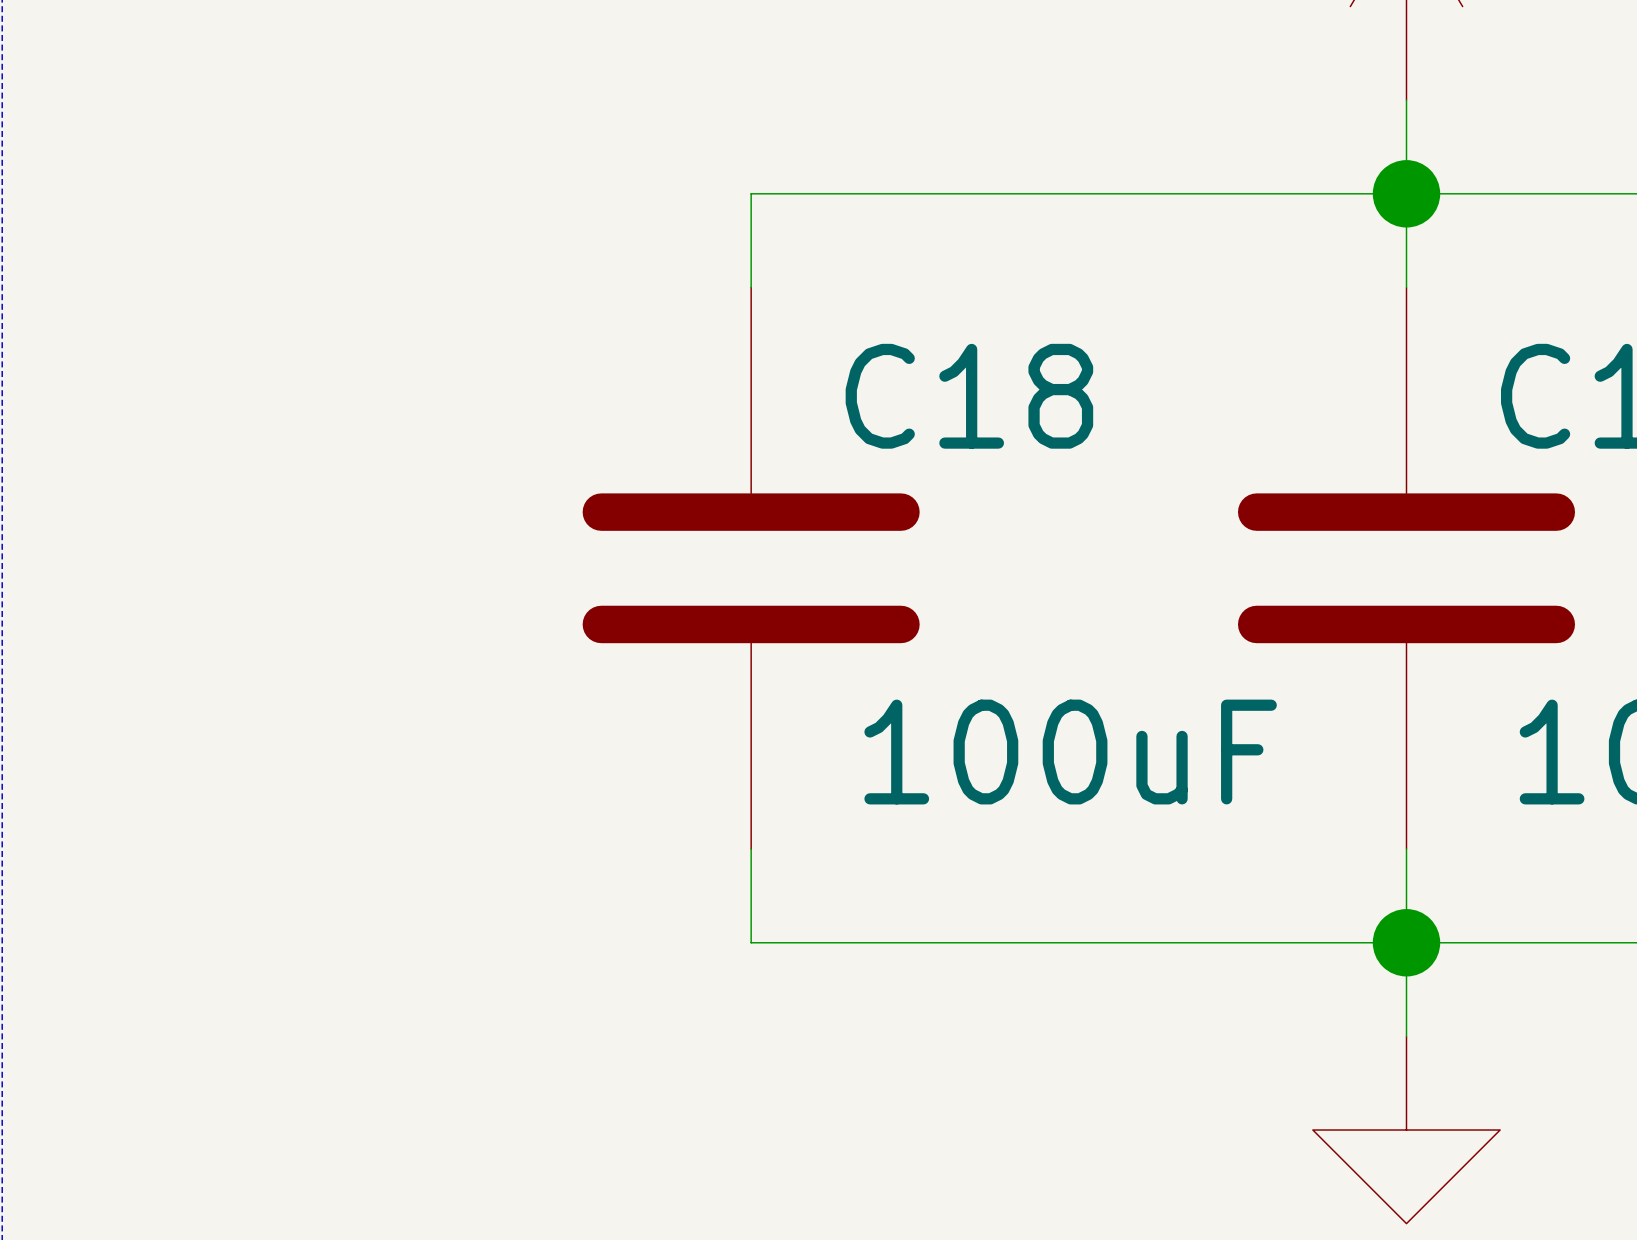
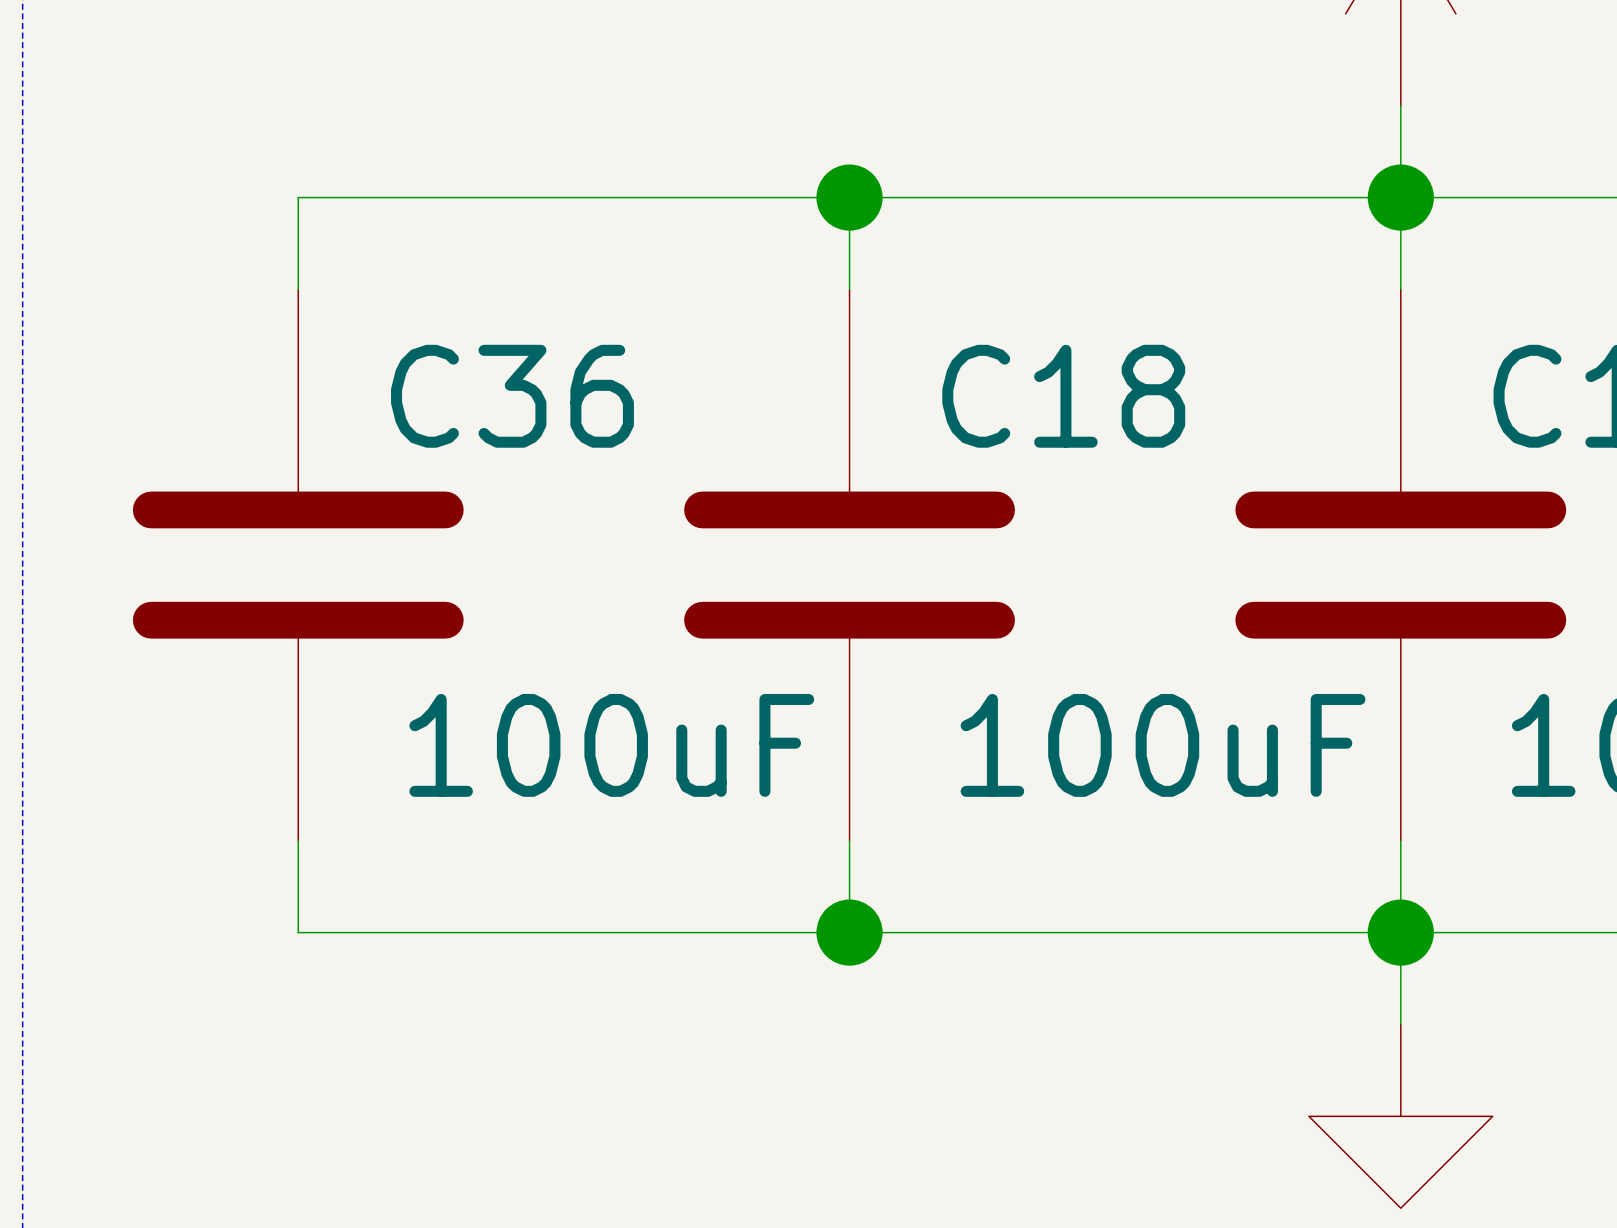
wire: (751, 193) (751, 287) -> (757, 197) (298, 197) (298, 289)
wire: none -> (849, 197) (849, 289)
junction: none -> (849, 197)
C36: none -> 100uF (298, 565)
C18 position: (751, 568) -> (849, 565)
wire: (751, 849) (751, 942) -> (298, 840) (298, 932) (757, 932)
wire: none -> (849, 840) (849, 932)
junction: none -> (849, 932)

